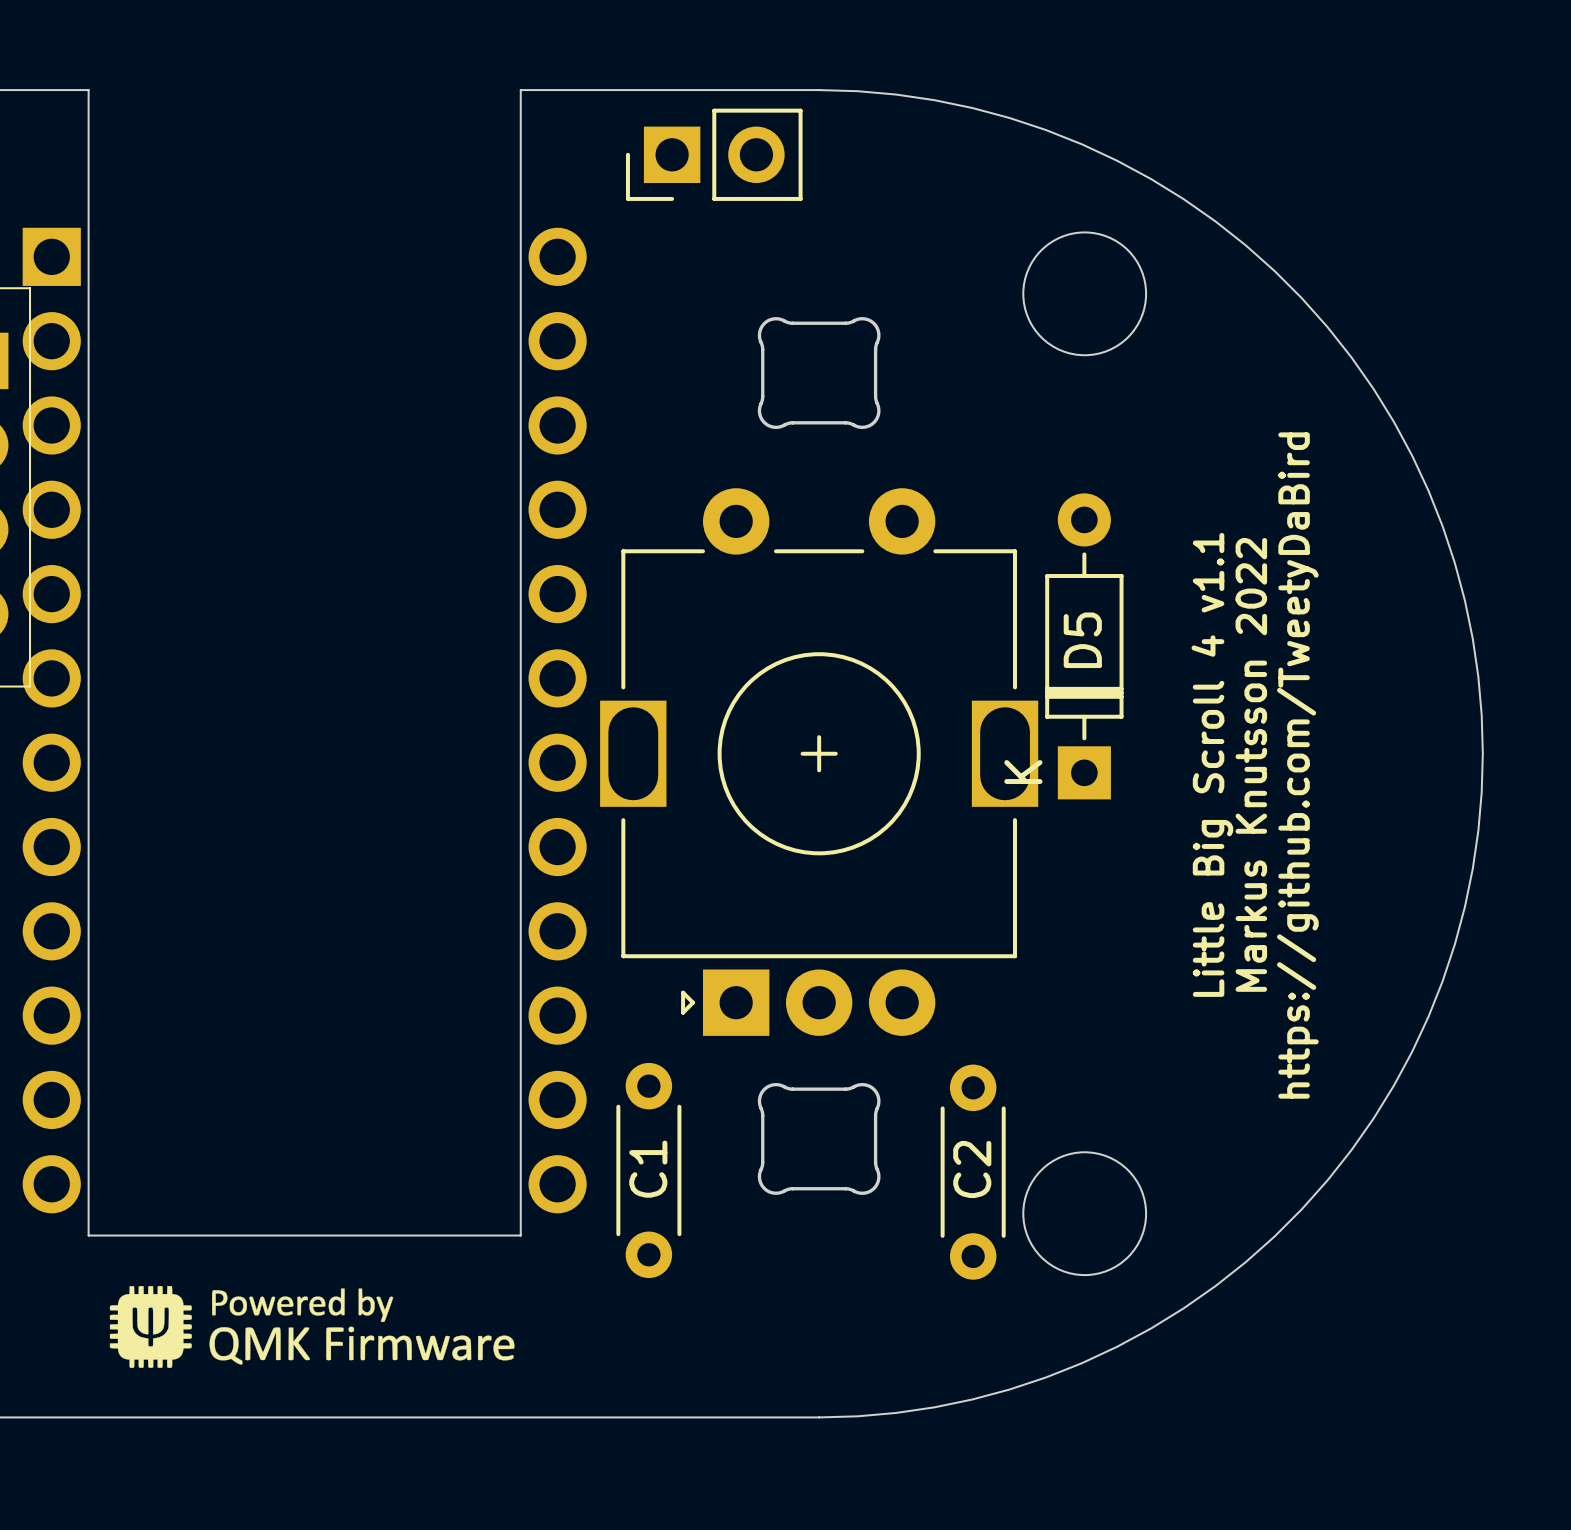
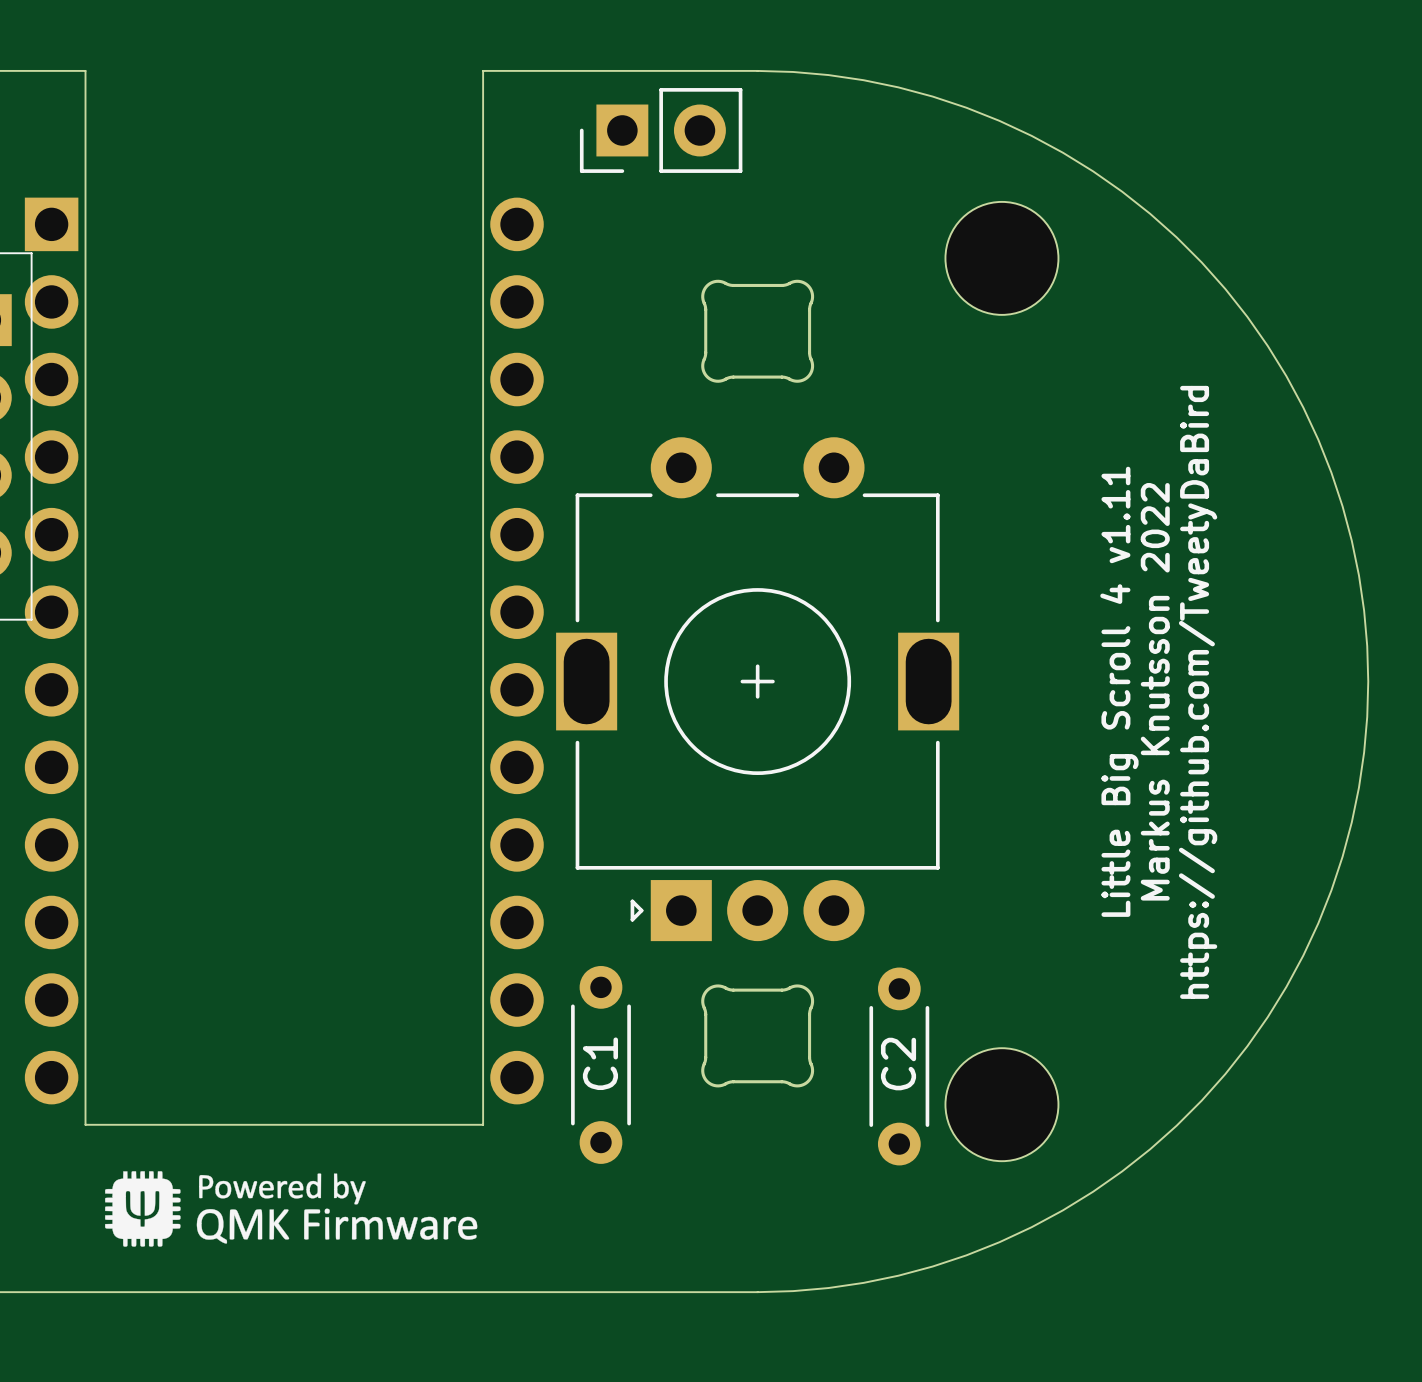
D5: (1084, 646) -> none
text: Little Big Scroll 4 v1.1 (1212, 764) -> Little Big Scroll 4 v1.11 (1119, 691)

